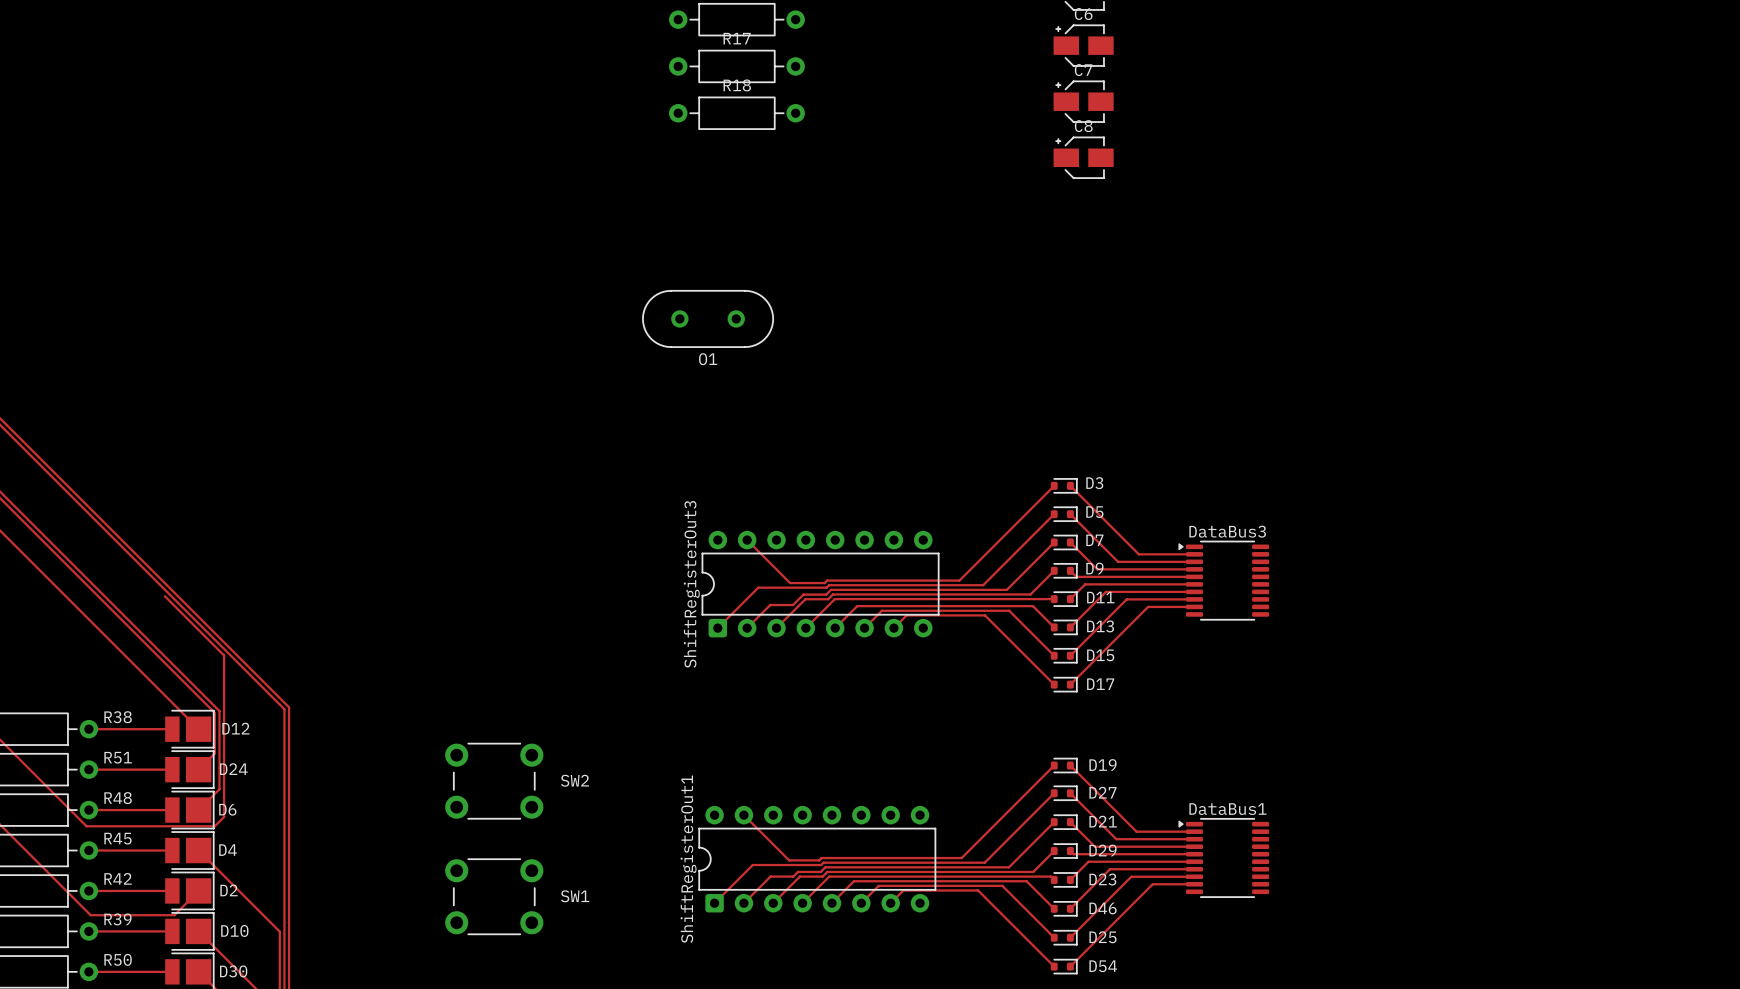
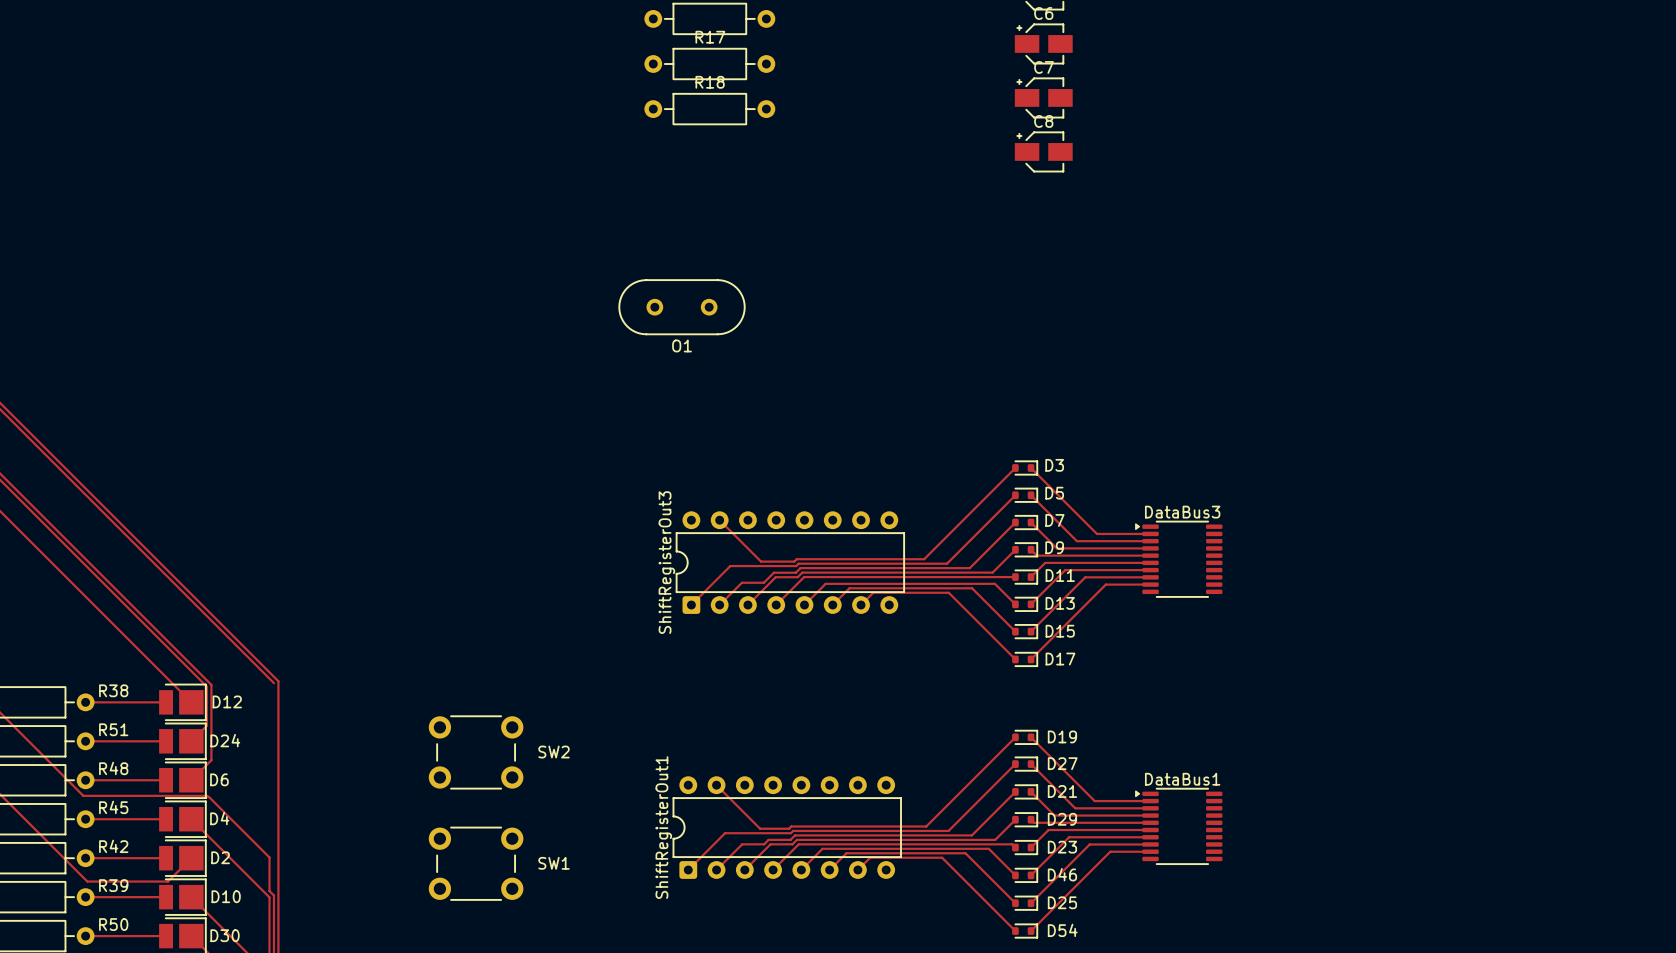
top track: (164, 596) (224, 655) (224, 816) (214, 826) -> none
top track: (284, 709) (284, 929) -> (206, 795) (269, 857) (269, 891) (273, 895)

